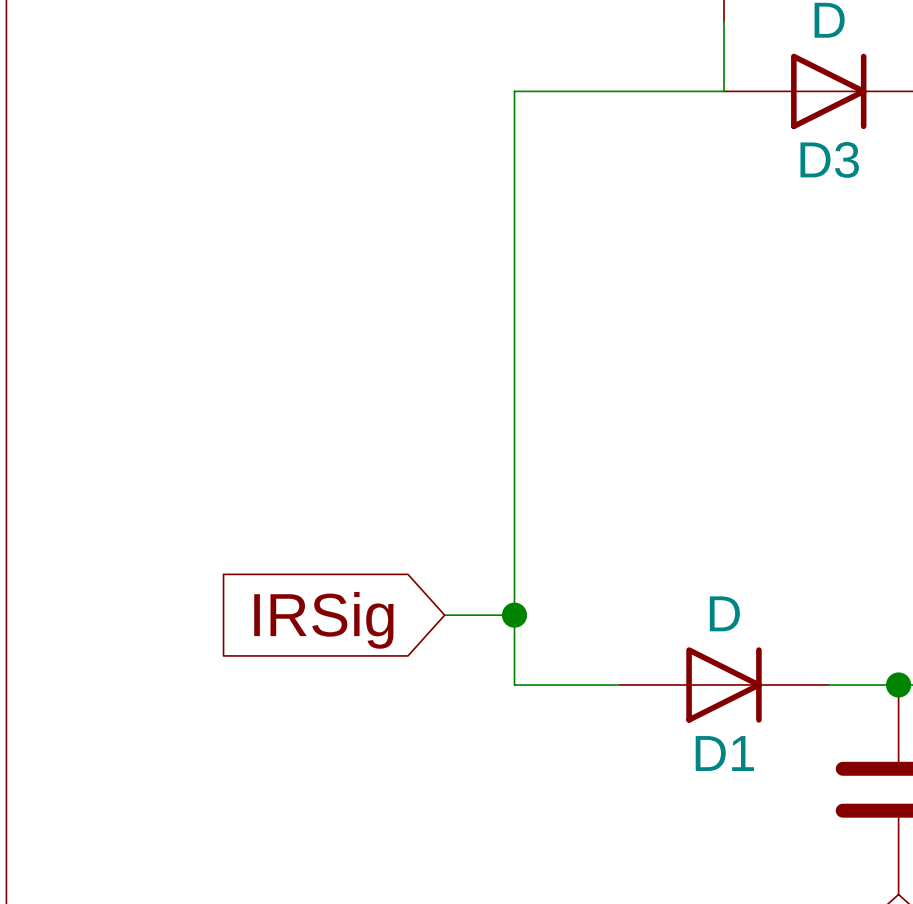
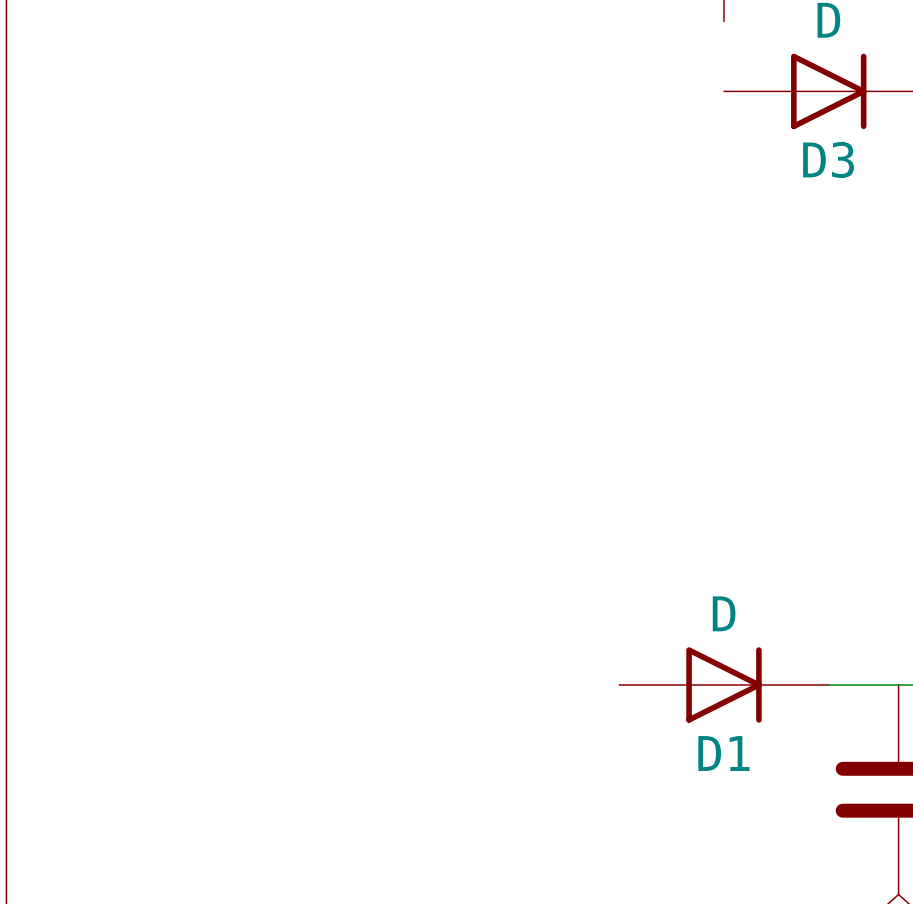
wire: (724, 21) (724, 91) (514, 91) (514, 684) (619, 684) -> none
wire: (444, 615) (514, 615) -> none
junction: (514, 615) -> none
global label: IRSig (323, 620) -> none
junction: (898, 684) -> none

